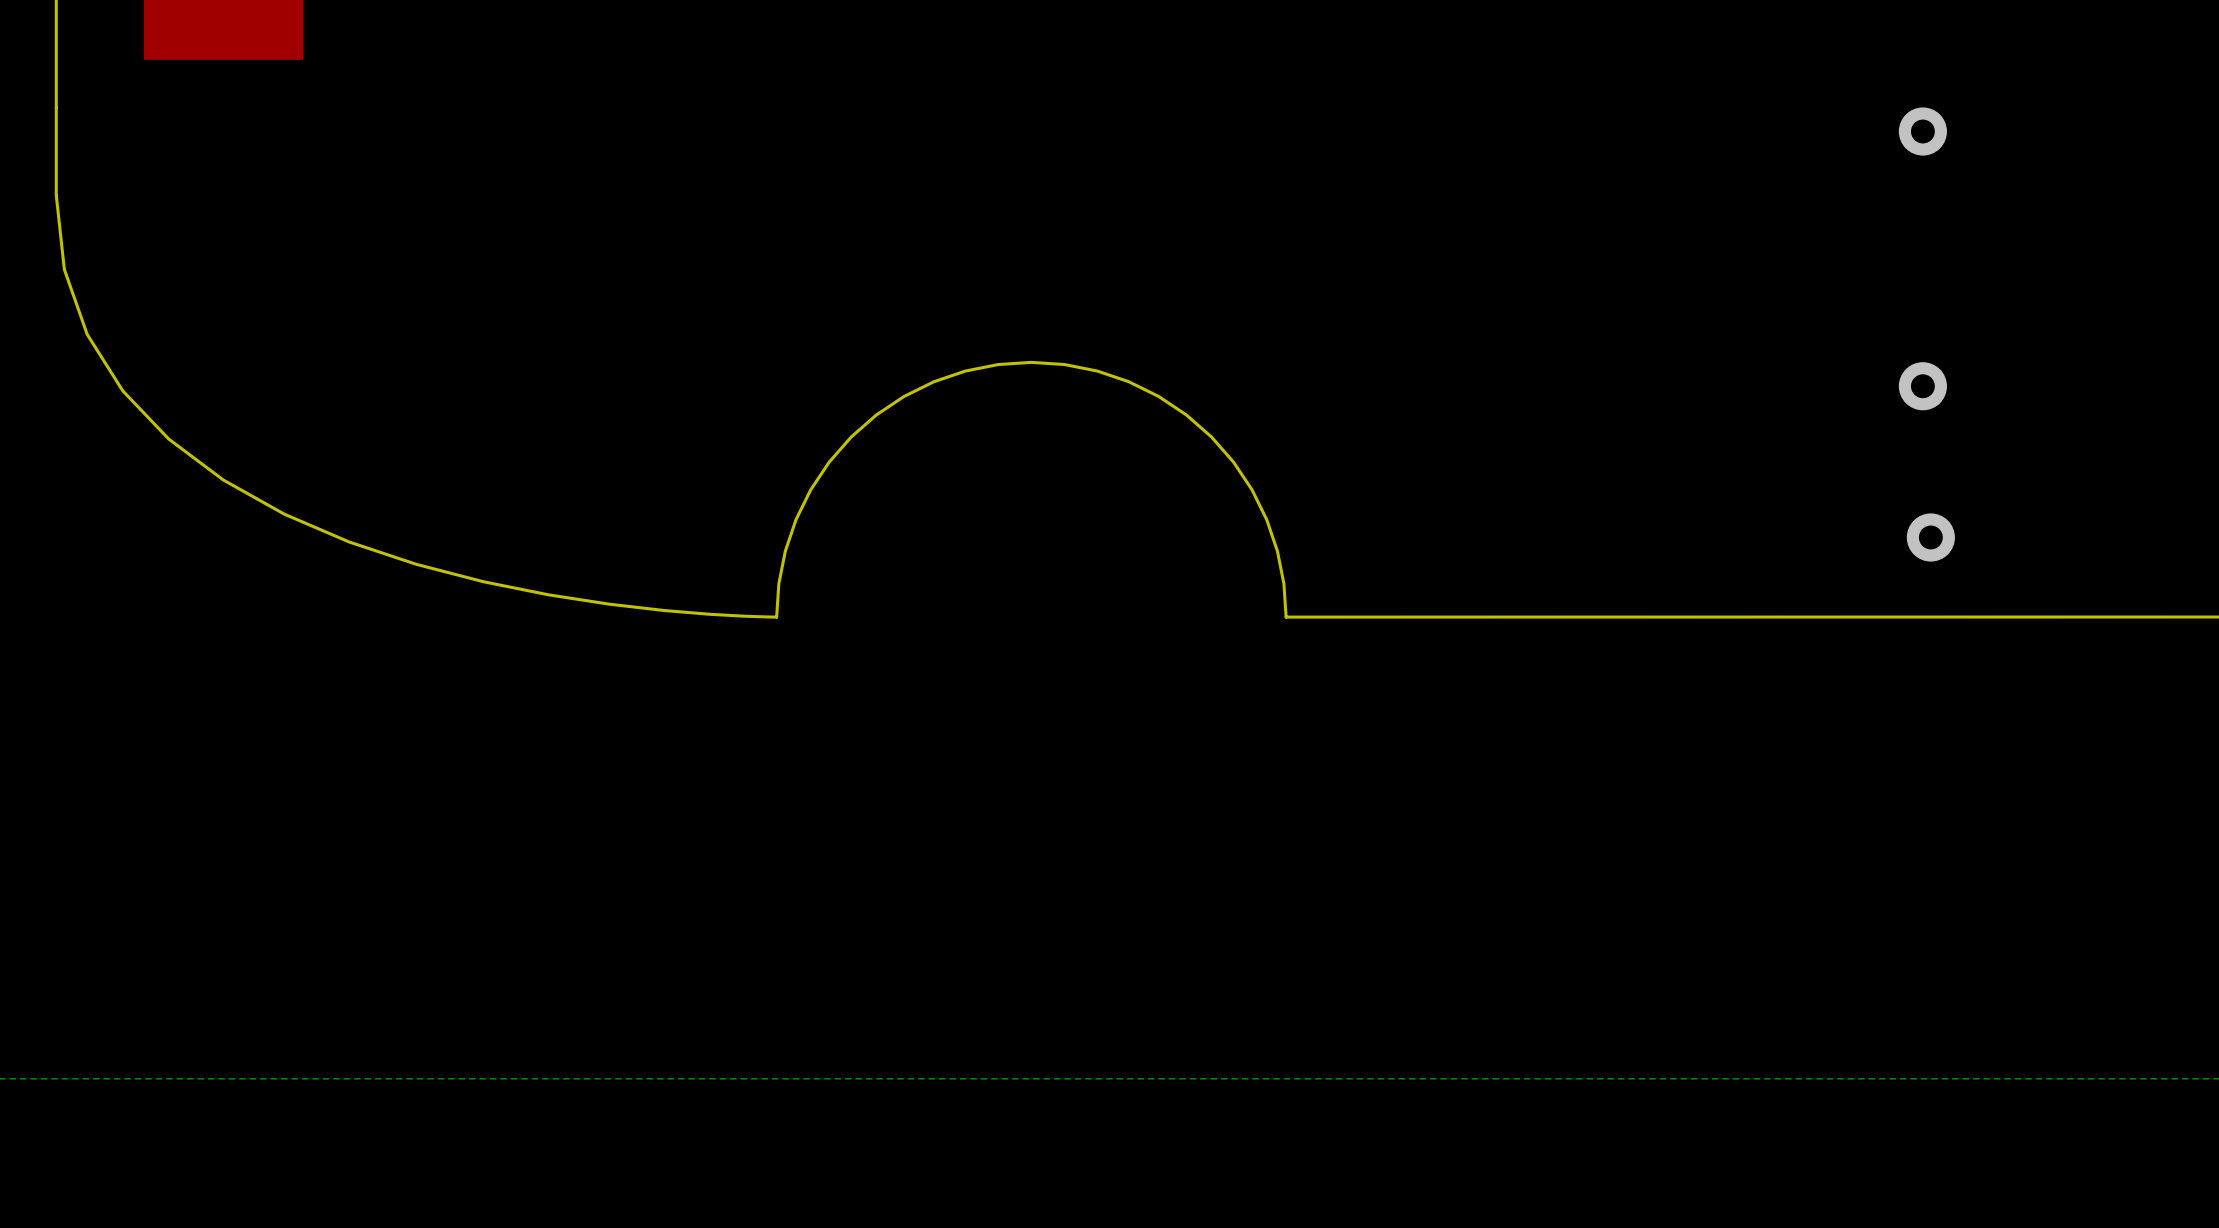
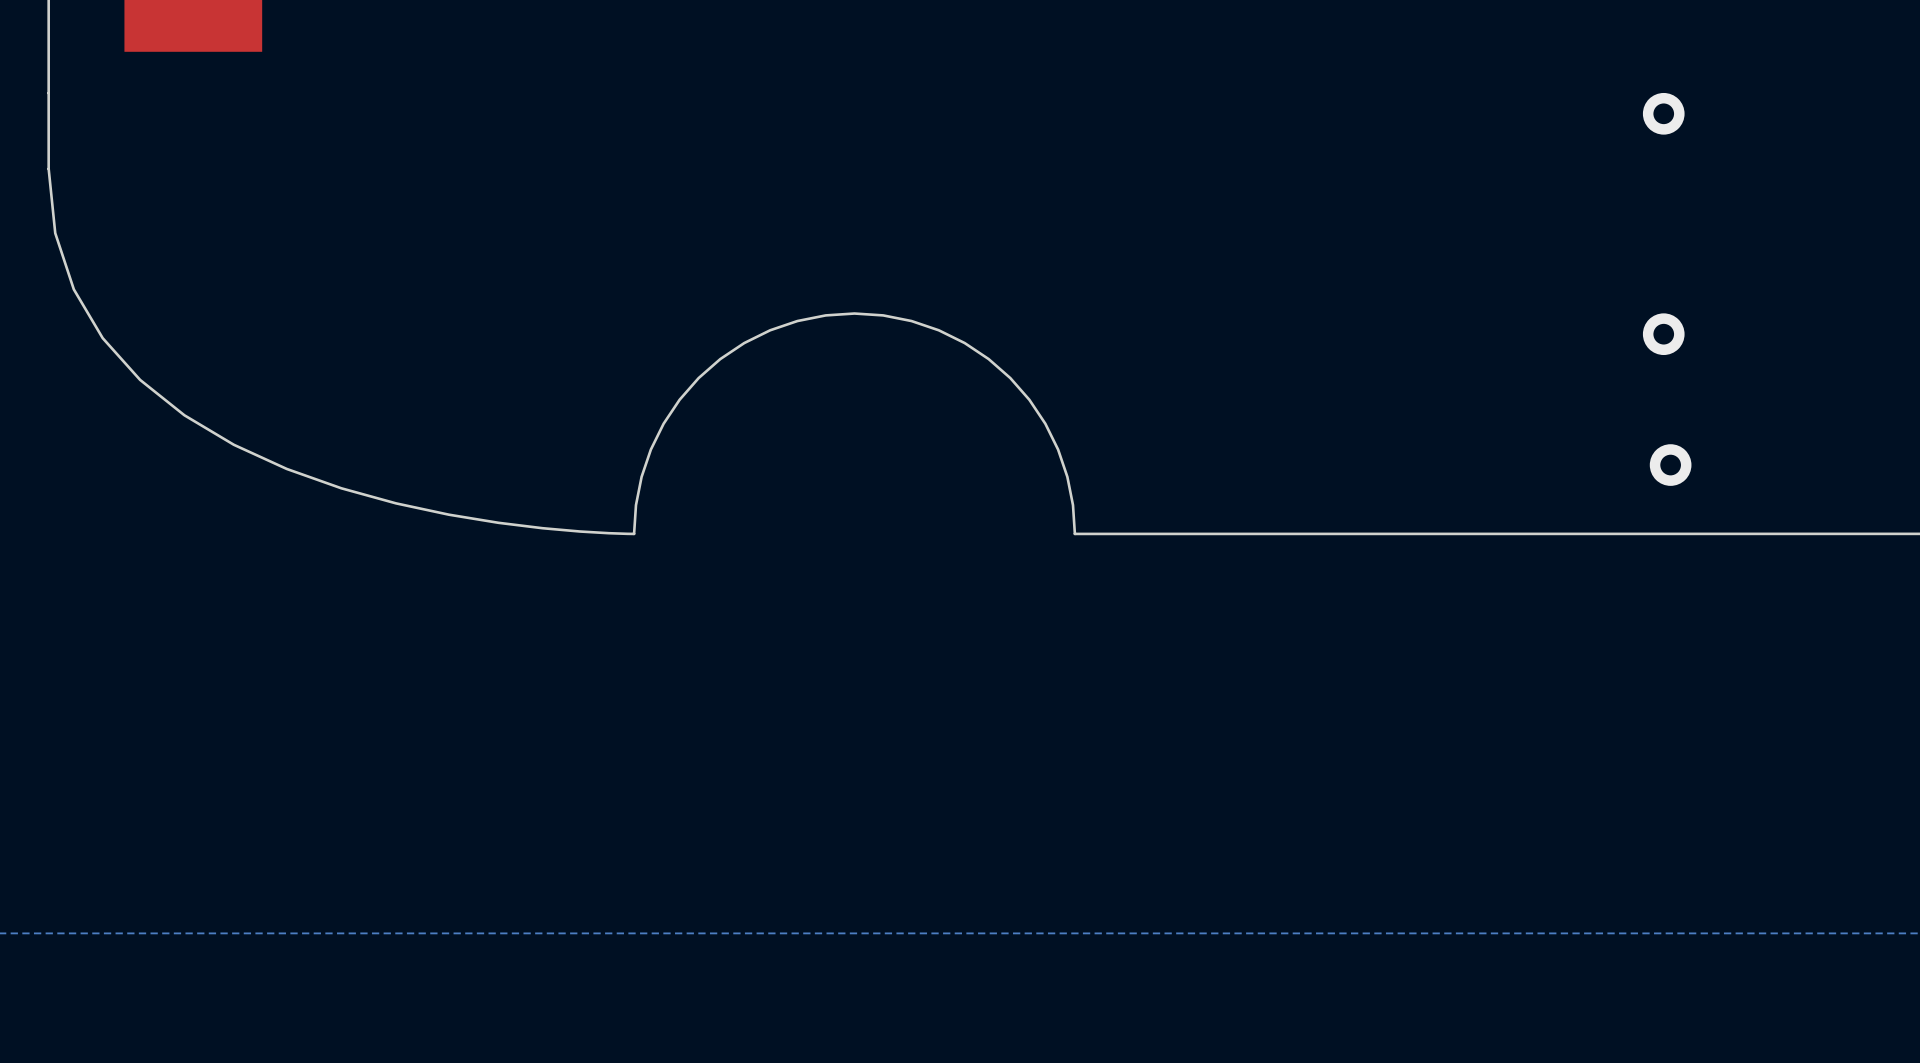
board edge: (56, 195) (64, 269) (87, 334) (122, 390) (168, 439) (223, 479) (284, 514) (349, 542) (416, 564) (483, 581) (548, 594) (664, 610) (776, 617) (778, 583) (785, 551) (796, 519) (810, 489) (829, 462) (851, 436) (876, 415) (904, 396) (933, 381) (965, 371) (998, 364) (1031, 362) (1064, 364) (1097, 371) (1128, 381) (1158, 396) (1186, 415) (1211, 436) (1233, 462) (1251, 489) (1266, 519) (1277, 551) (1283, 583) (1286, 617) -> (48, 168) (55, 233) (73, 289) (102, 338) (140, 379) (184, 415) (233, 444) (286, 468) (341, 488) (395, 503) (498, 522) (580, 531) (634, 533) (635, 505) (641, 476) (650, 449) (663, 423) (679, 399) (698, 378) (720, 359) (744, 343) (770, 330) (797, 321) (825, 315) (854, 313) (883, 315) (911, 321) (938, 330) (964, 343) (988, 359) (1010, 378) (1029, 399) (1045, 423) (1058, 449) (1067, 476) (1072, 505) (1074, 533) (1112, 533)

